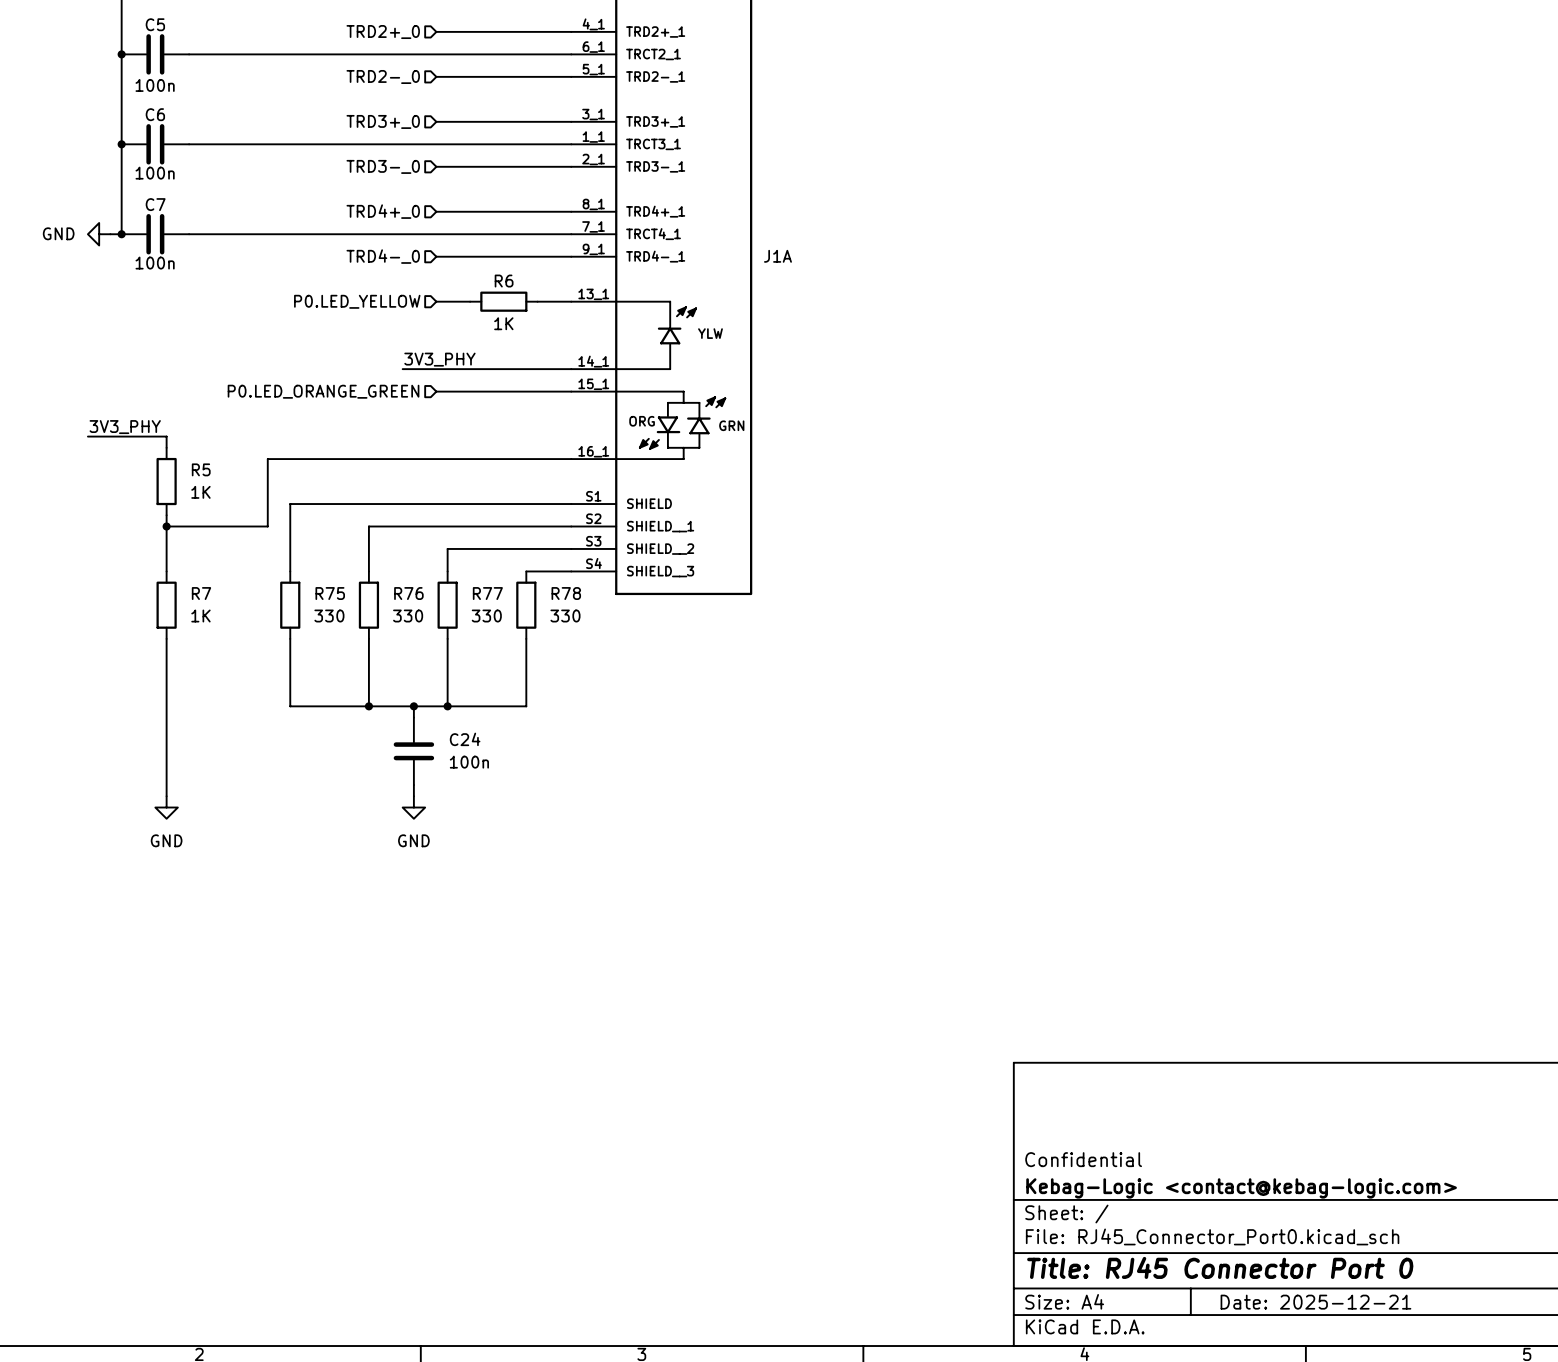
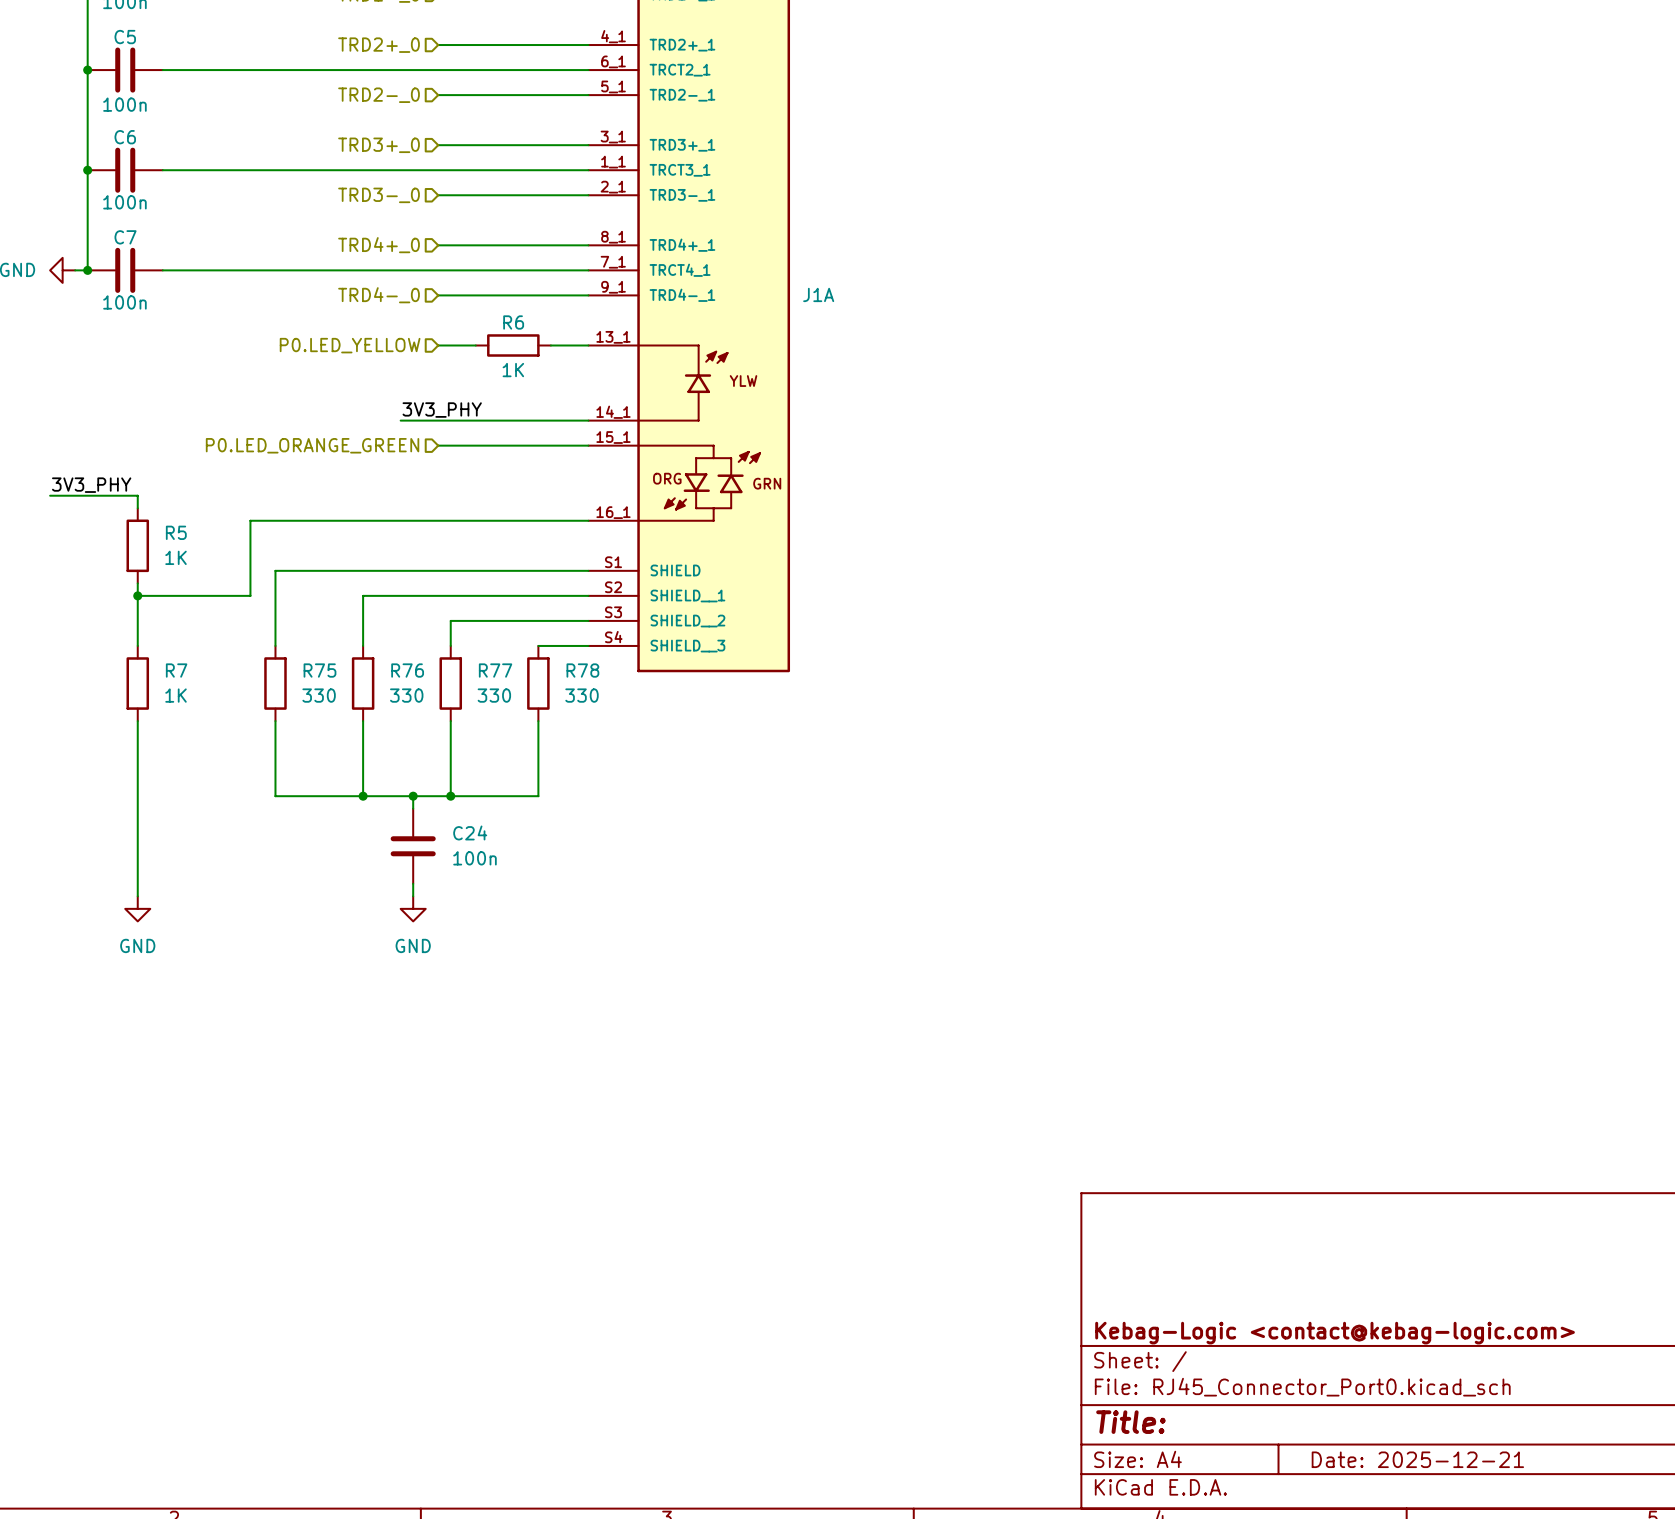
title block: Confidential (1083, 1159) -> none
title block: Title: RJ45 Connector Port 0 (1220, 1267) -> Title: (1130, 1422)

